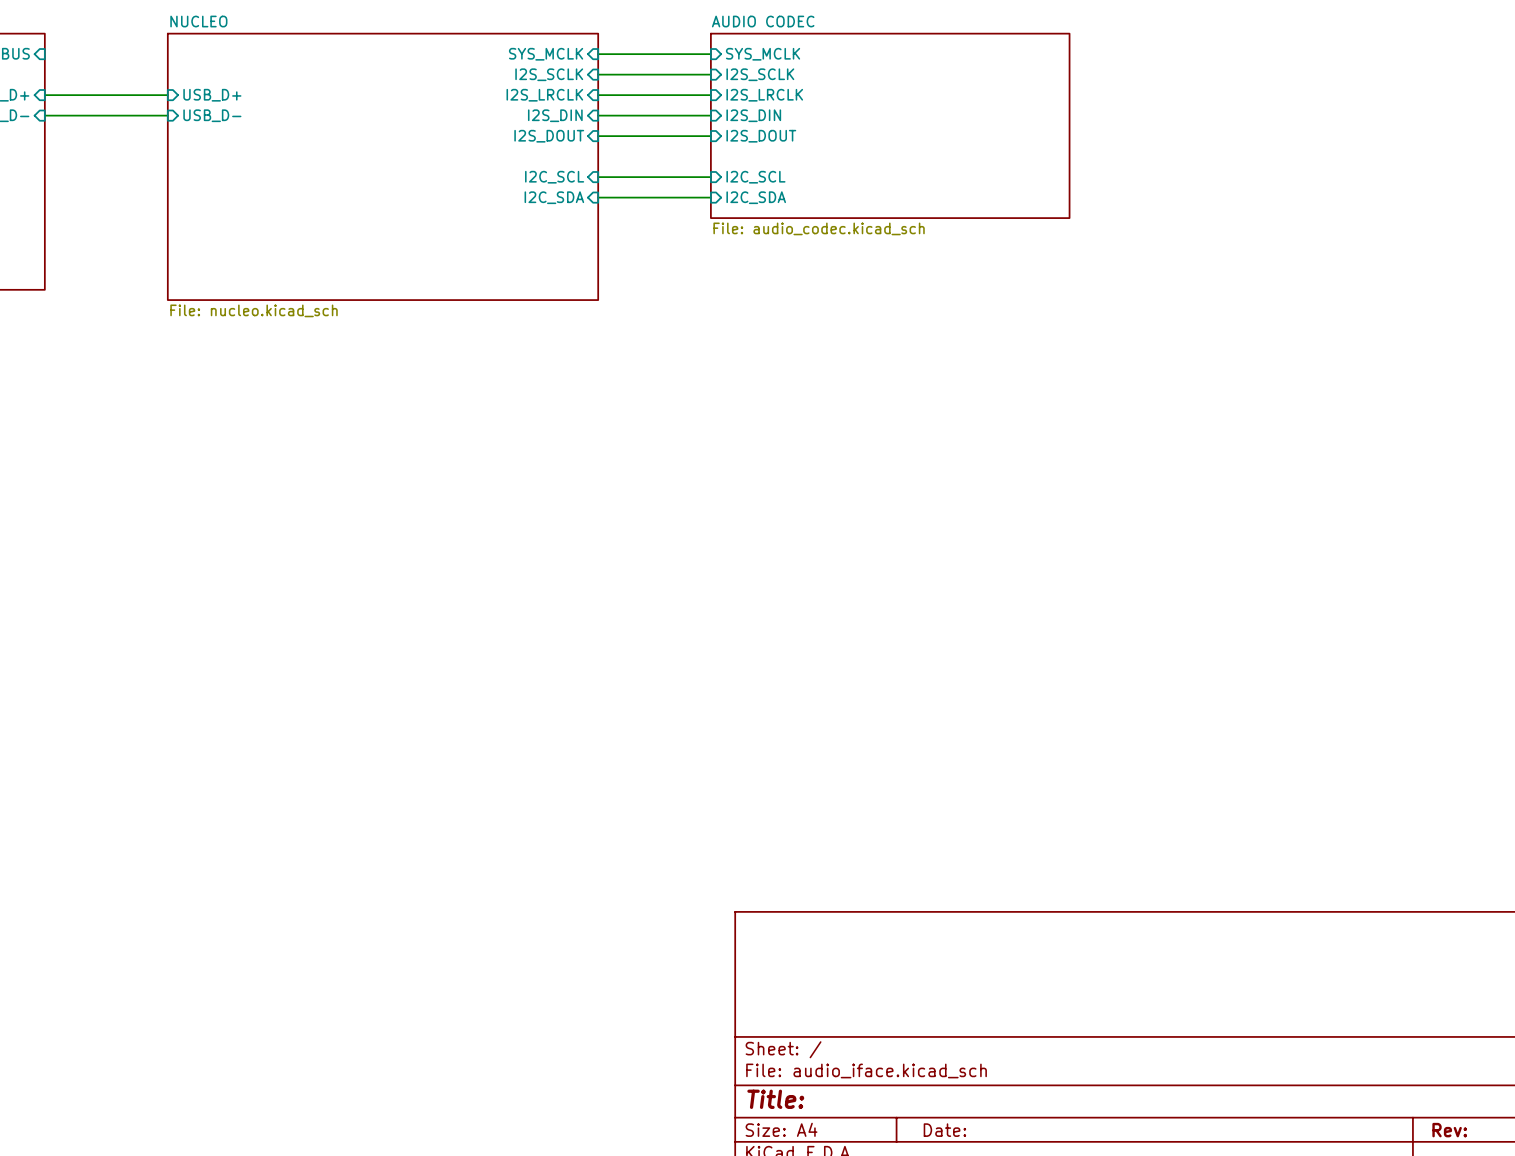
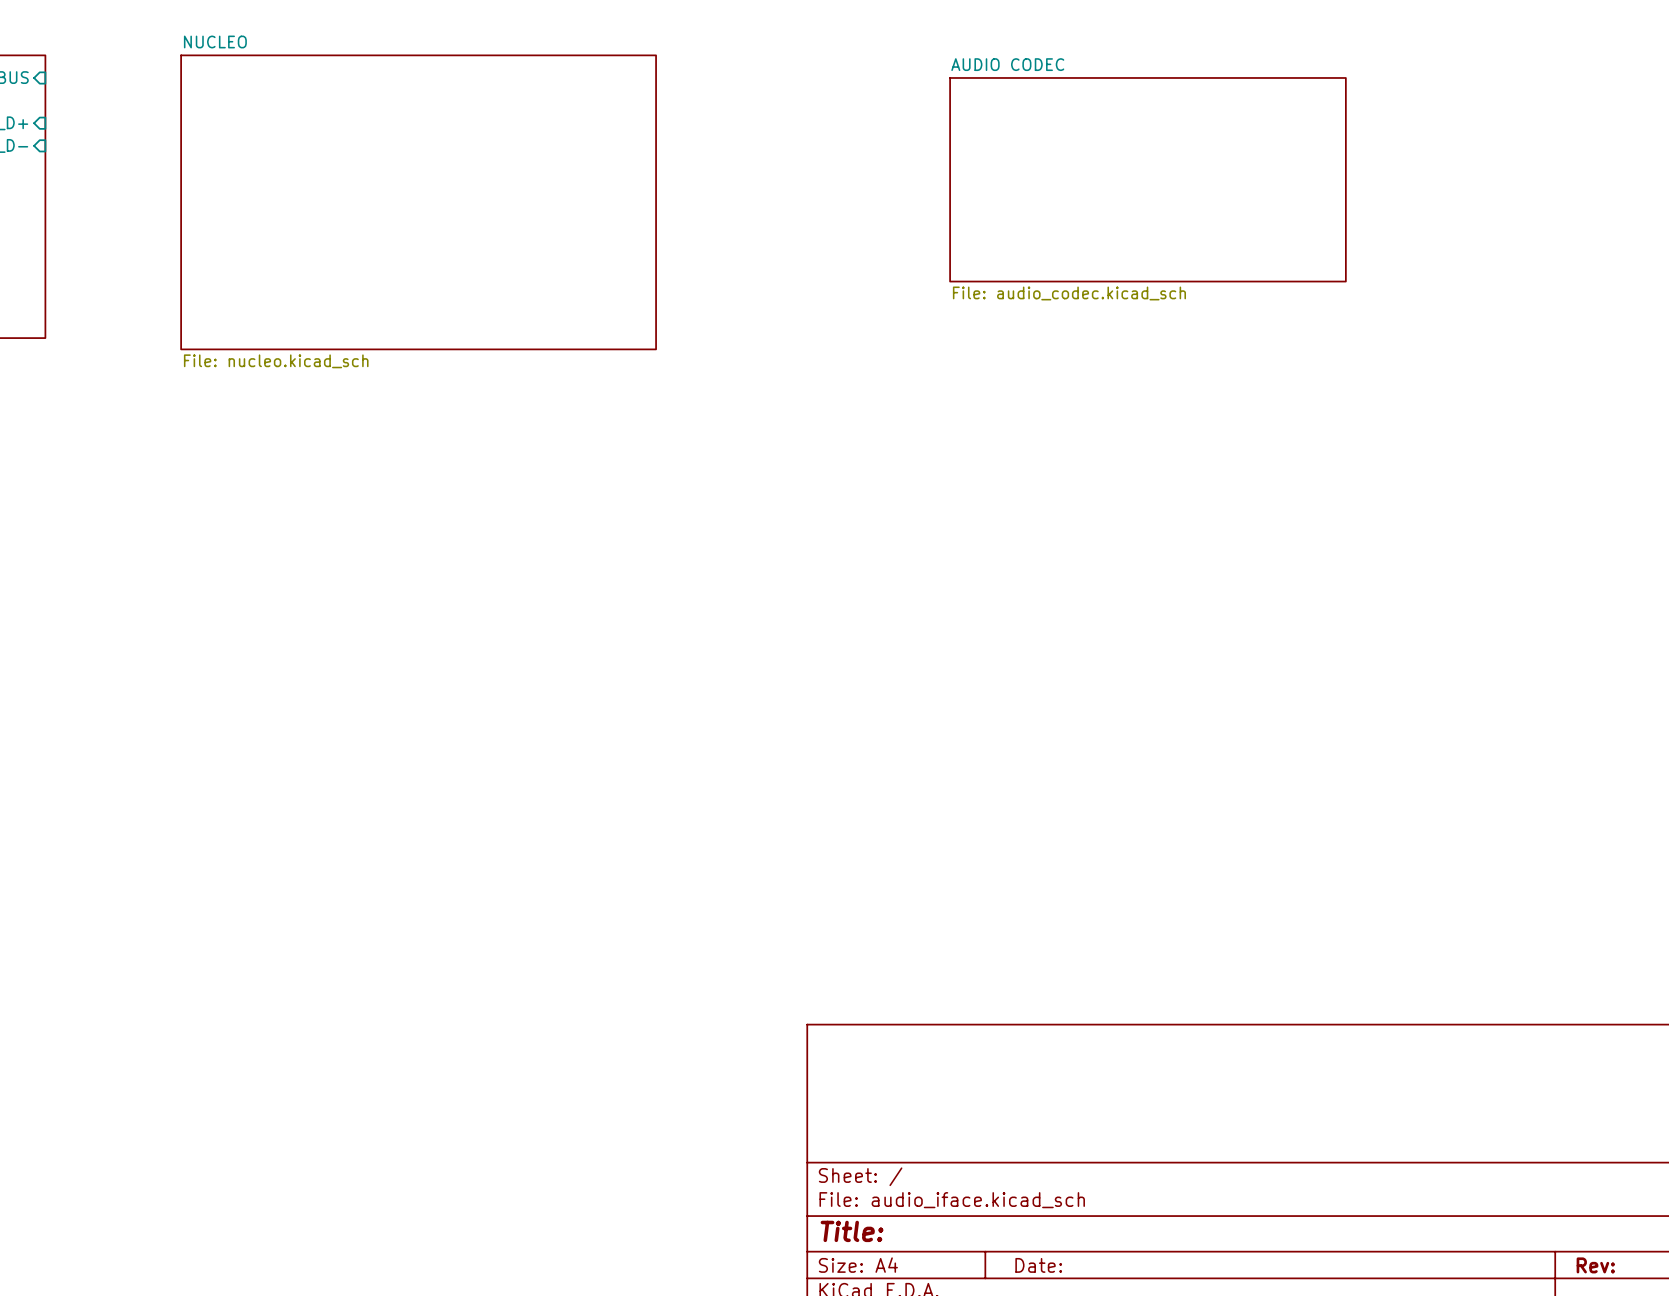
sheet pin: SYS_MCLK (546, 54) -> none
wire: (598, 54) (710, 54) -> none
sheet pin: SYS_MCLK (763, 54) -> none
sheet pin: I2S_SCLK (549, 74) -> none
wire: (598, 74) (710, 74) -> none
sheet pin: I2S_SCLK (760, 74) -> none
wire: (44, 95) (167, 95) -> none
sheet pin: USB_D+ (212, 95) -> none
sheet pin: I2S_LRCLK (544, 95) -> none
wire: (598, 95) (710, 95) -> none
sheet pin: I2S_LRCLK (764, 95) -> none
wire: (44, 115) (167, 115) -> none
sheet pin: USB_D- (212, 115) -> none
sheet pin: I2S_DIN (555, 115) -> none
wire: (598, 115) (710, 115) -> none
sheet pin: I2S_DIN (753, 115) -> none
sheet AUDIO CODEC position: (890, 125) -> (1147, 179)
sheet pin: I2S_DOUT (549, 136) -> none
wire: (598, 136) (710, 136) -> none
sheet pin: I2S_DOUT (761, 136) -> none
sheet pin: I2C_SCL (554, 177) -> none
wire: (598, 177) (710, 177) -> none
sheet pin: I2C_SCL (755, 177) -> none
sheet pin: I2C_SDA (554, 197) -> none
wire: (598, 197) (710, 197) -> none
sheet pin: I2C_SDA (756, 197) -> none

